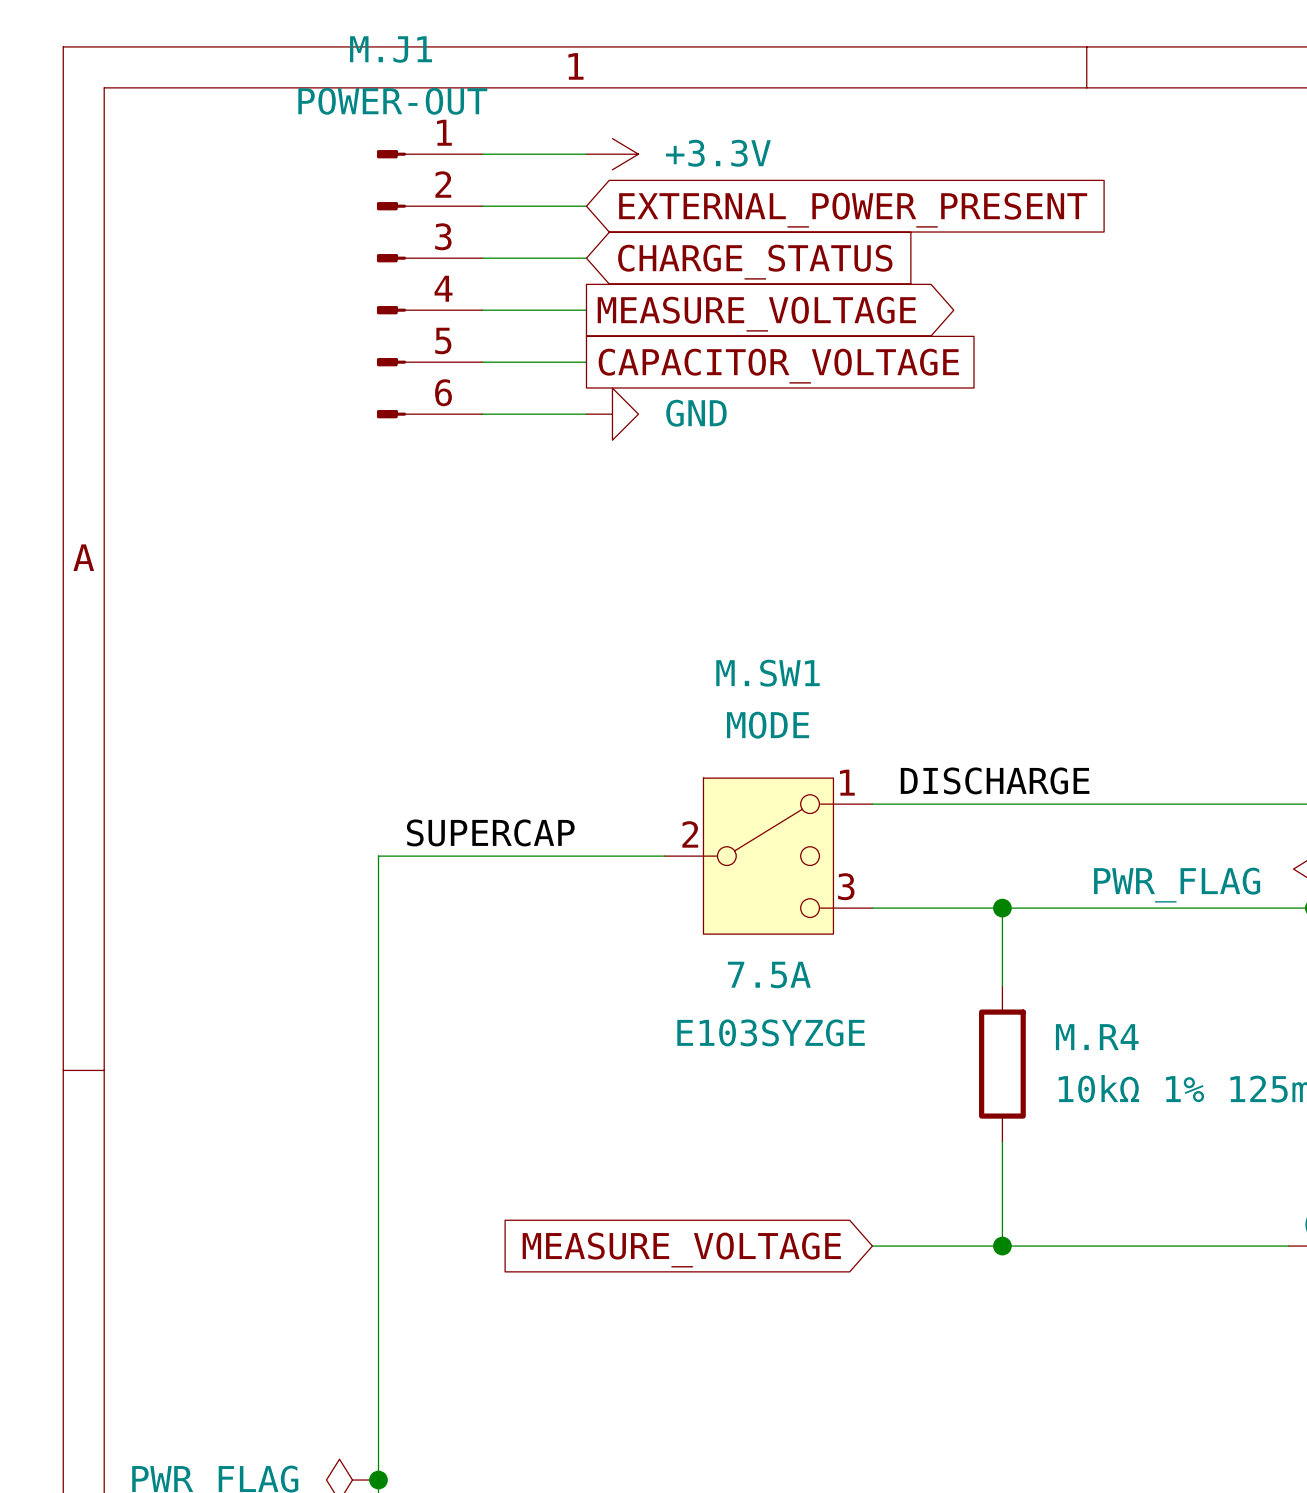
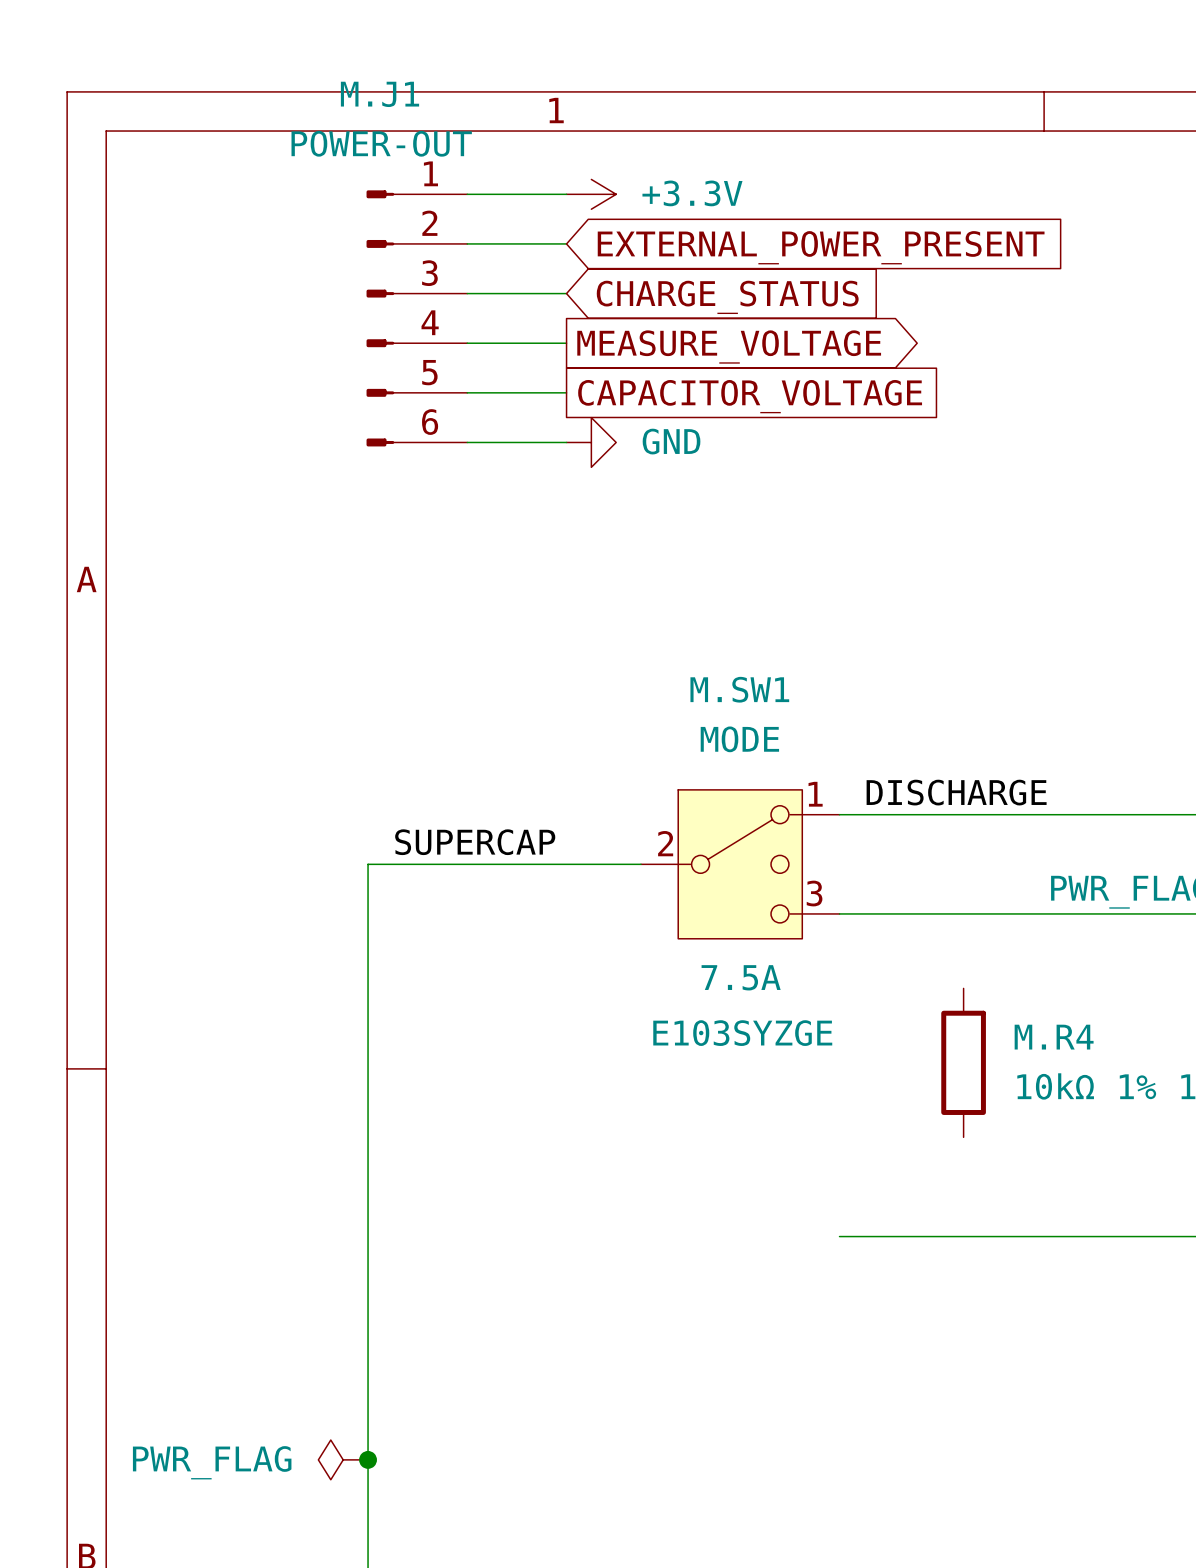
wire: (1002, 908) (1002, 986) -> none
junction: (1002, 908) -> none
wire: (1002, 1142) (1002, 1246) -> none
junction: (1002, 1246) -> none
global label: MEASURE_VOLTAGE (681, 1250) -> none

